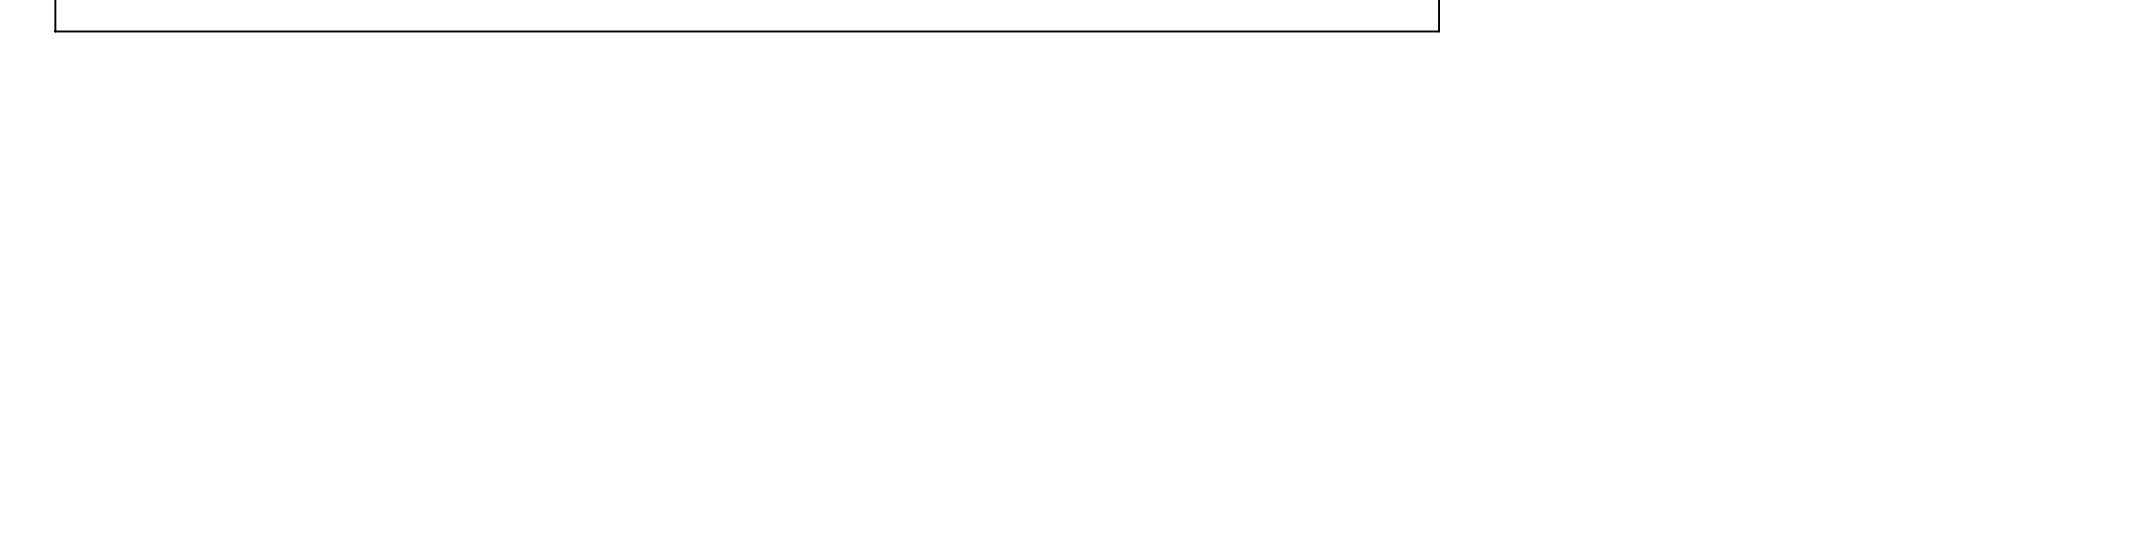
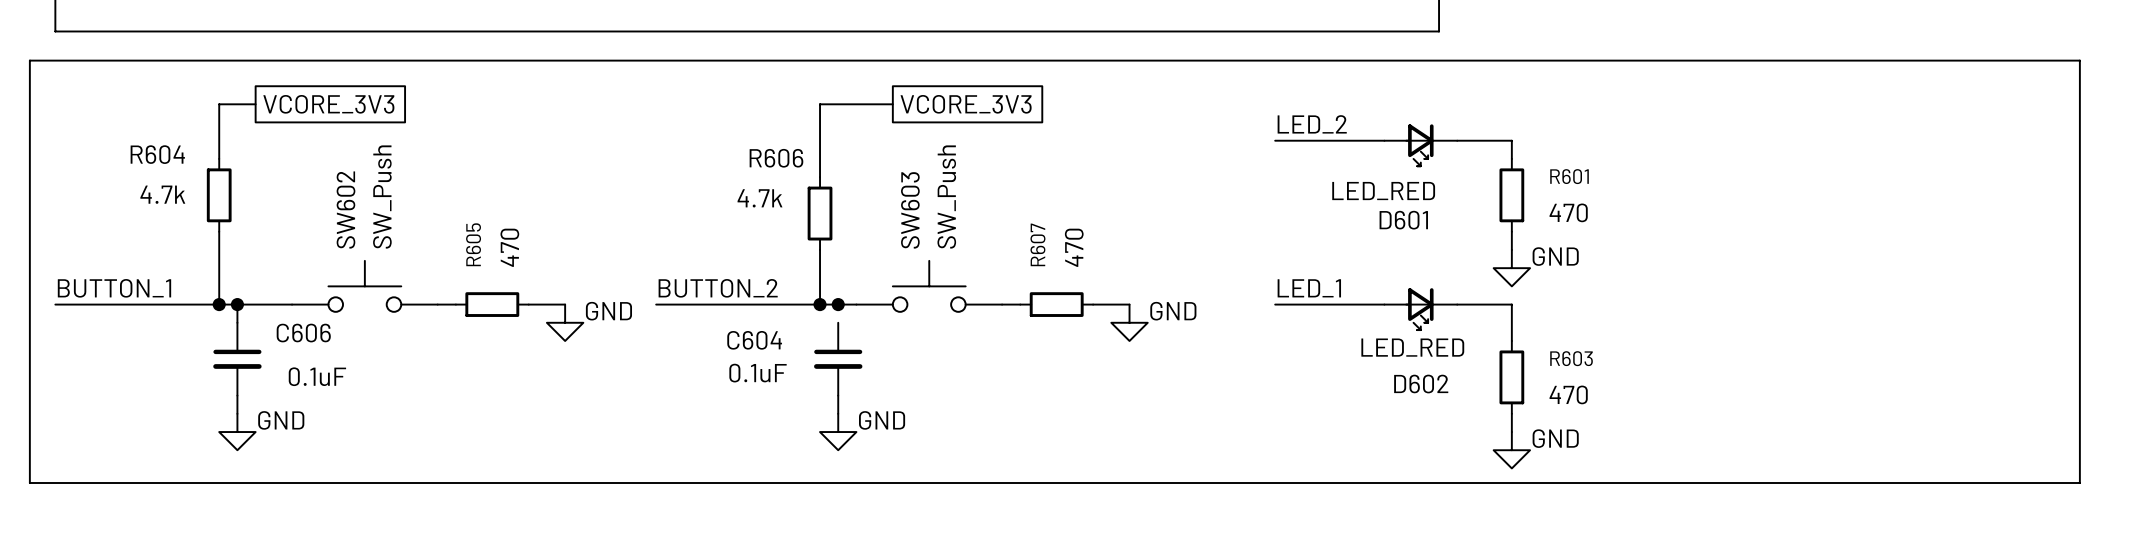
line: none -> (29, 60) (2079, 60) (2079, 482) (29, 482) (29, 60)
wire: none -> (255, 104) (219, 104) (219, 158)
global label: none -> VCORE_3V3 (328, 104)
wire: none -> (892, 104) (820, 104) (820, 177)
global label: none -> VCORE_3V3 (966, 104)
label: none -> LED_2 (1312, 124)
wire: none -> (1275, 140) (1384, 140)
wire: none -> (1457, 140) (1511, 140) (1511, 158)
D601: none -> LED_RED (1420, 145)
R604: none -> 4.7k (219, 195)
R601: none -> 470 (1511, 195)
R606: none -> 4.7k (820, 213)
wire: none -> (219, 231) (219, 304)
wire: none -> (1511, 231) (1511, 249)
wire: none -> (820, 249) (820, 304)
power symbol: none -> GND (1511, 268)
SW602: none -> SW_Push (364, 286)
SW603: none -> SW_Push (929, 286)
label: none -> BUTTON_1 (114, 288)
label: none -> BUTTON_2 (718, 288)
label: none -> LED_1 (1309, 288)
wire: none -> (55, 304) (292, 304)
junction: none -> (219, 304)
wire: none -> (237, 304) (237, 322)
junction: none -> (237, 304)
wire: none -> (437, 304) (455, 304)
R605: none -> 470 (492, 304)
wire: none -> (528, 304) (565, 304)
wire: none -> (656, 304) (856, 304)
junction: none -> (820, 304)
junction: none -> (838, 304)
wire: none -> (1002, 304) (1020, 304)
R607: none -> 470 (1056, 304)
wire: none -> (1093, 304) (1129, 304)
wire: none -> (1275, 304) (1384, 304)
wire: none -> (1457, 304) (1511, 304) (1511, 340)
D602: none -> LED_RED (1420, 309)
power symbol: none -> GND (565, 322)
power symbol: none -> GND (1129, 322)
C606: none -> 0.1uF (237, 359)
C604: none -> 0.1uF (838, 359)
R603: none -> 470 (1511, 377)
wire: none -> (237, 395) (237, 413)
wire: none -> (838, 395) (838, 413)
wire: none -> (1511, 413) (1511, 432)
power symbol: none -> GND (237, 432)
power symbol: none -> GND (838, 432)
power symbol: none -> GND (1511, 450)

